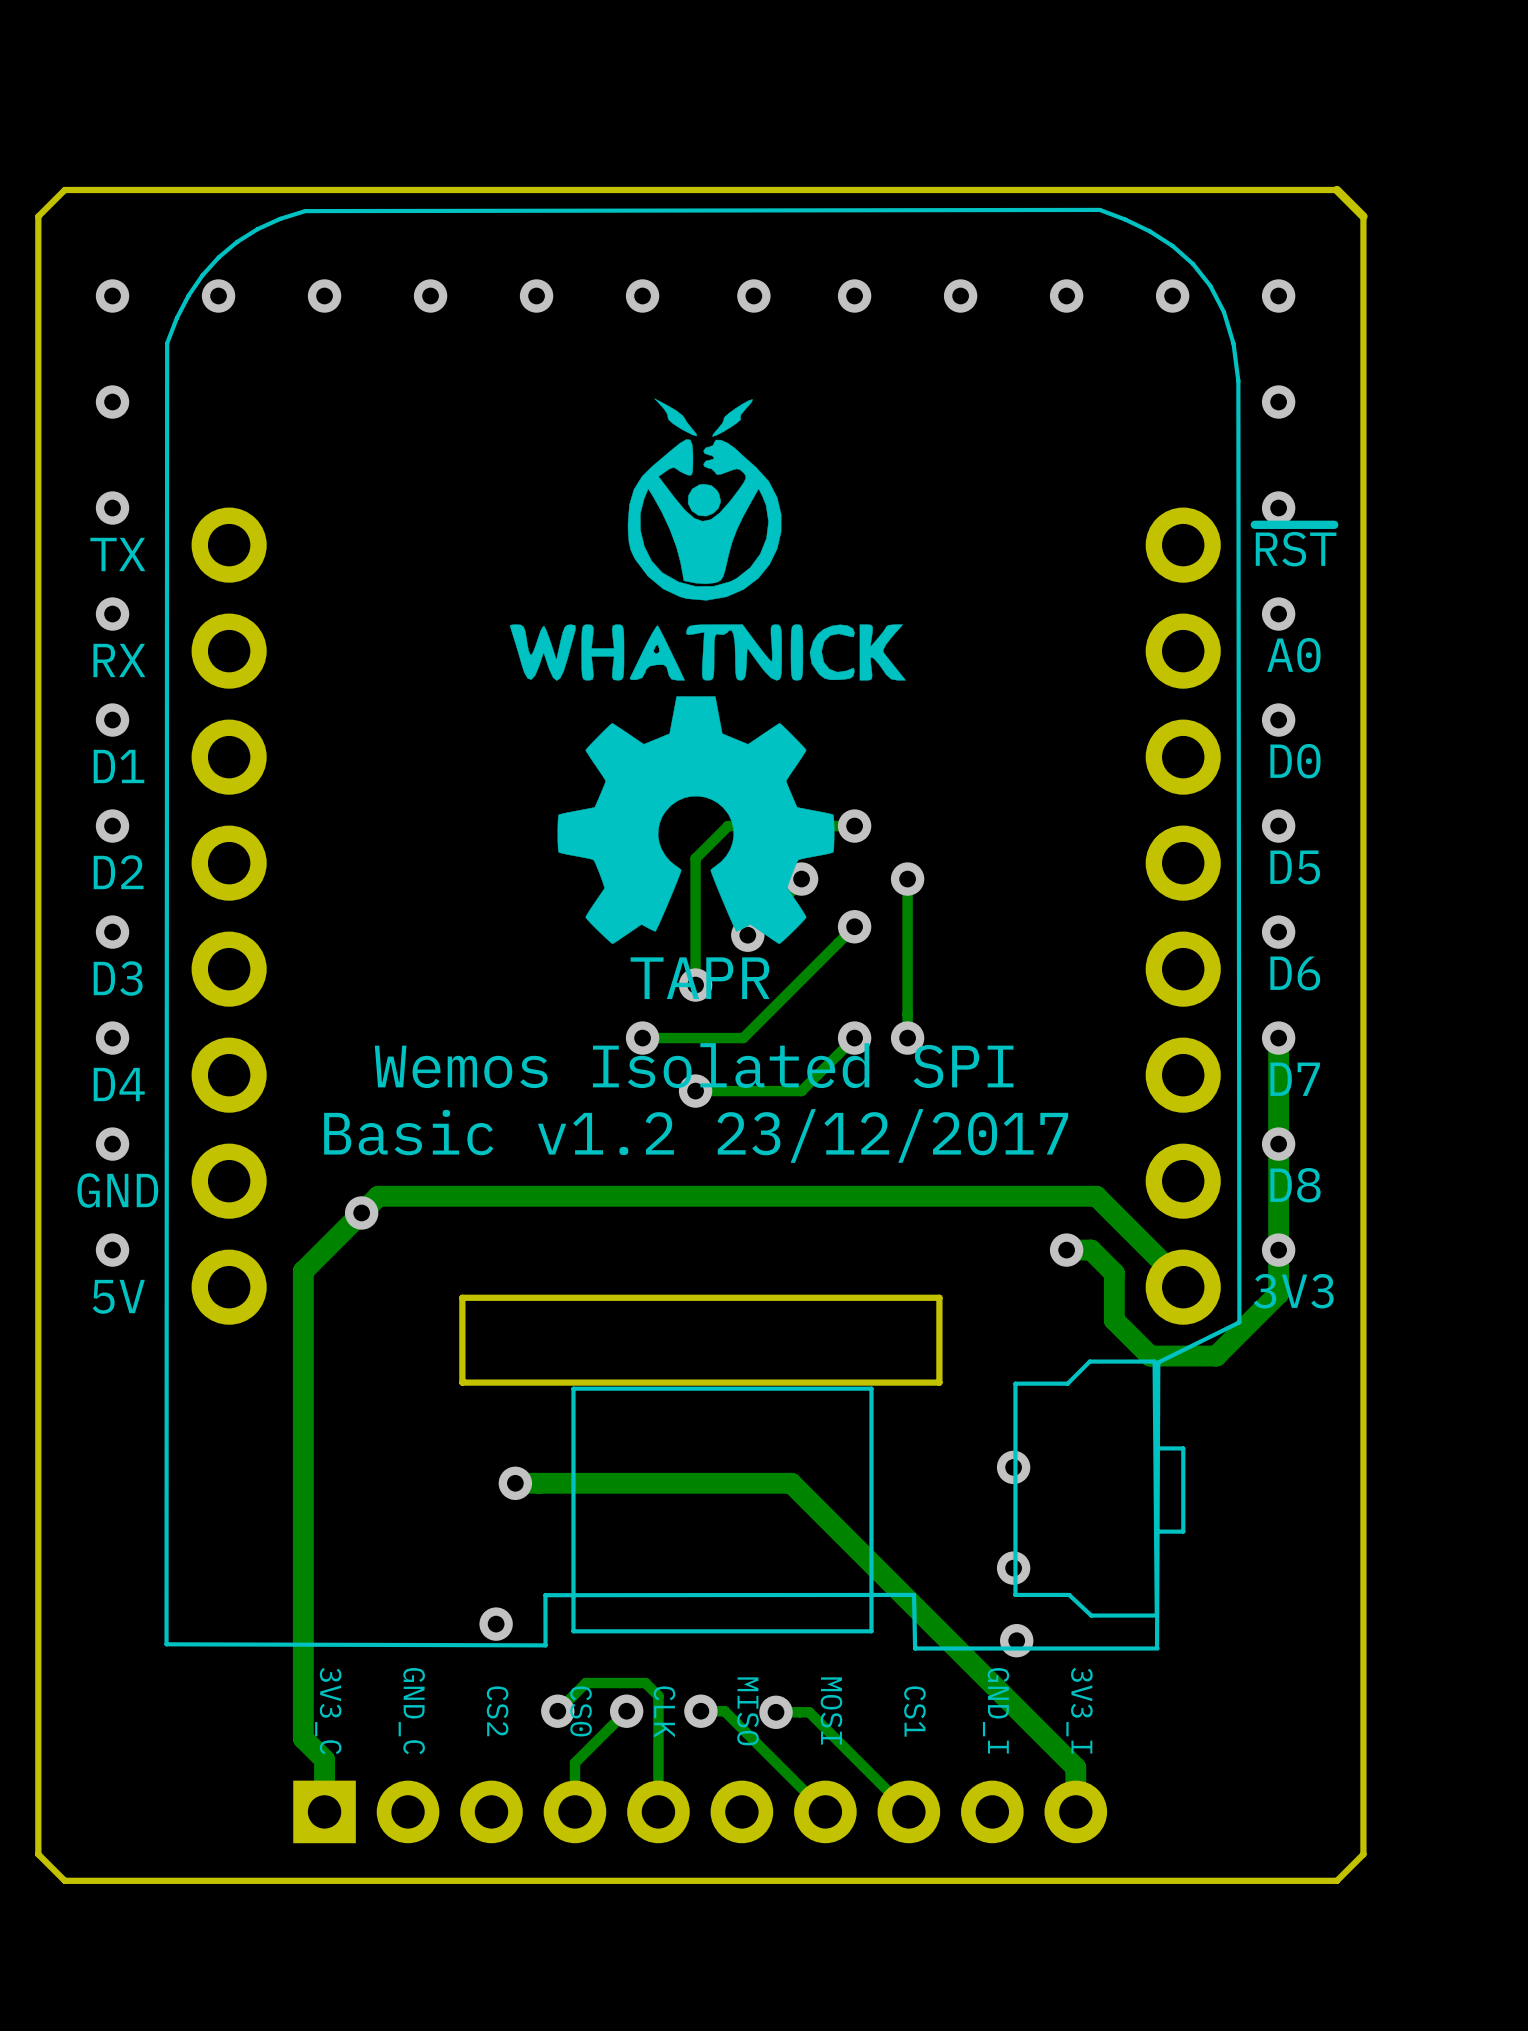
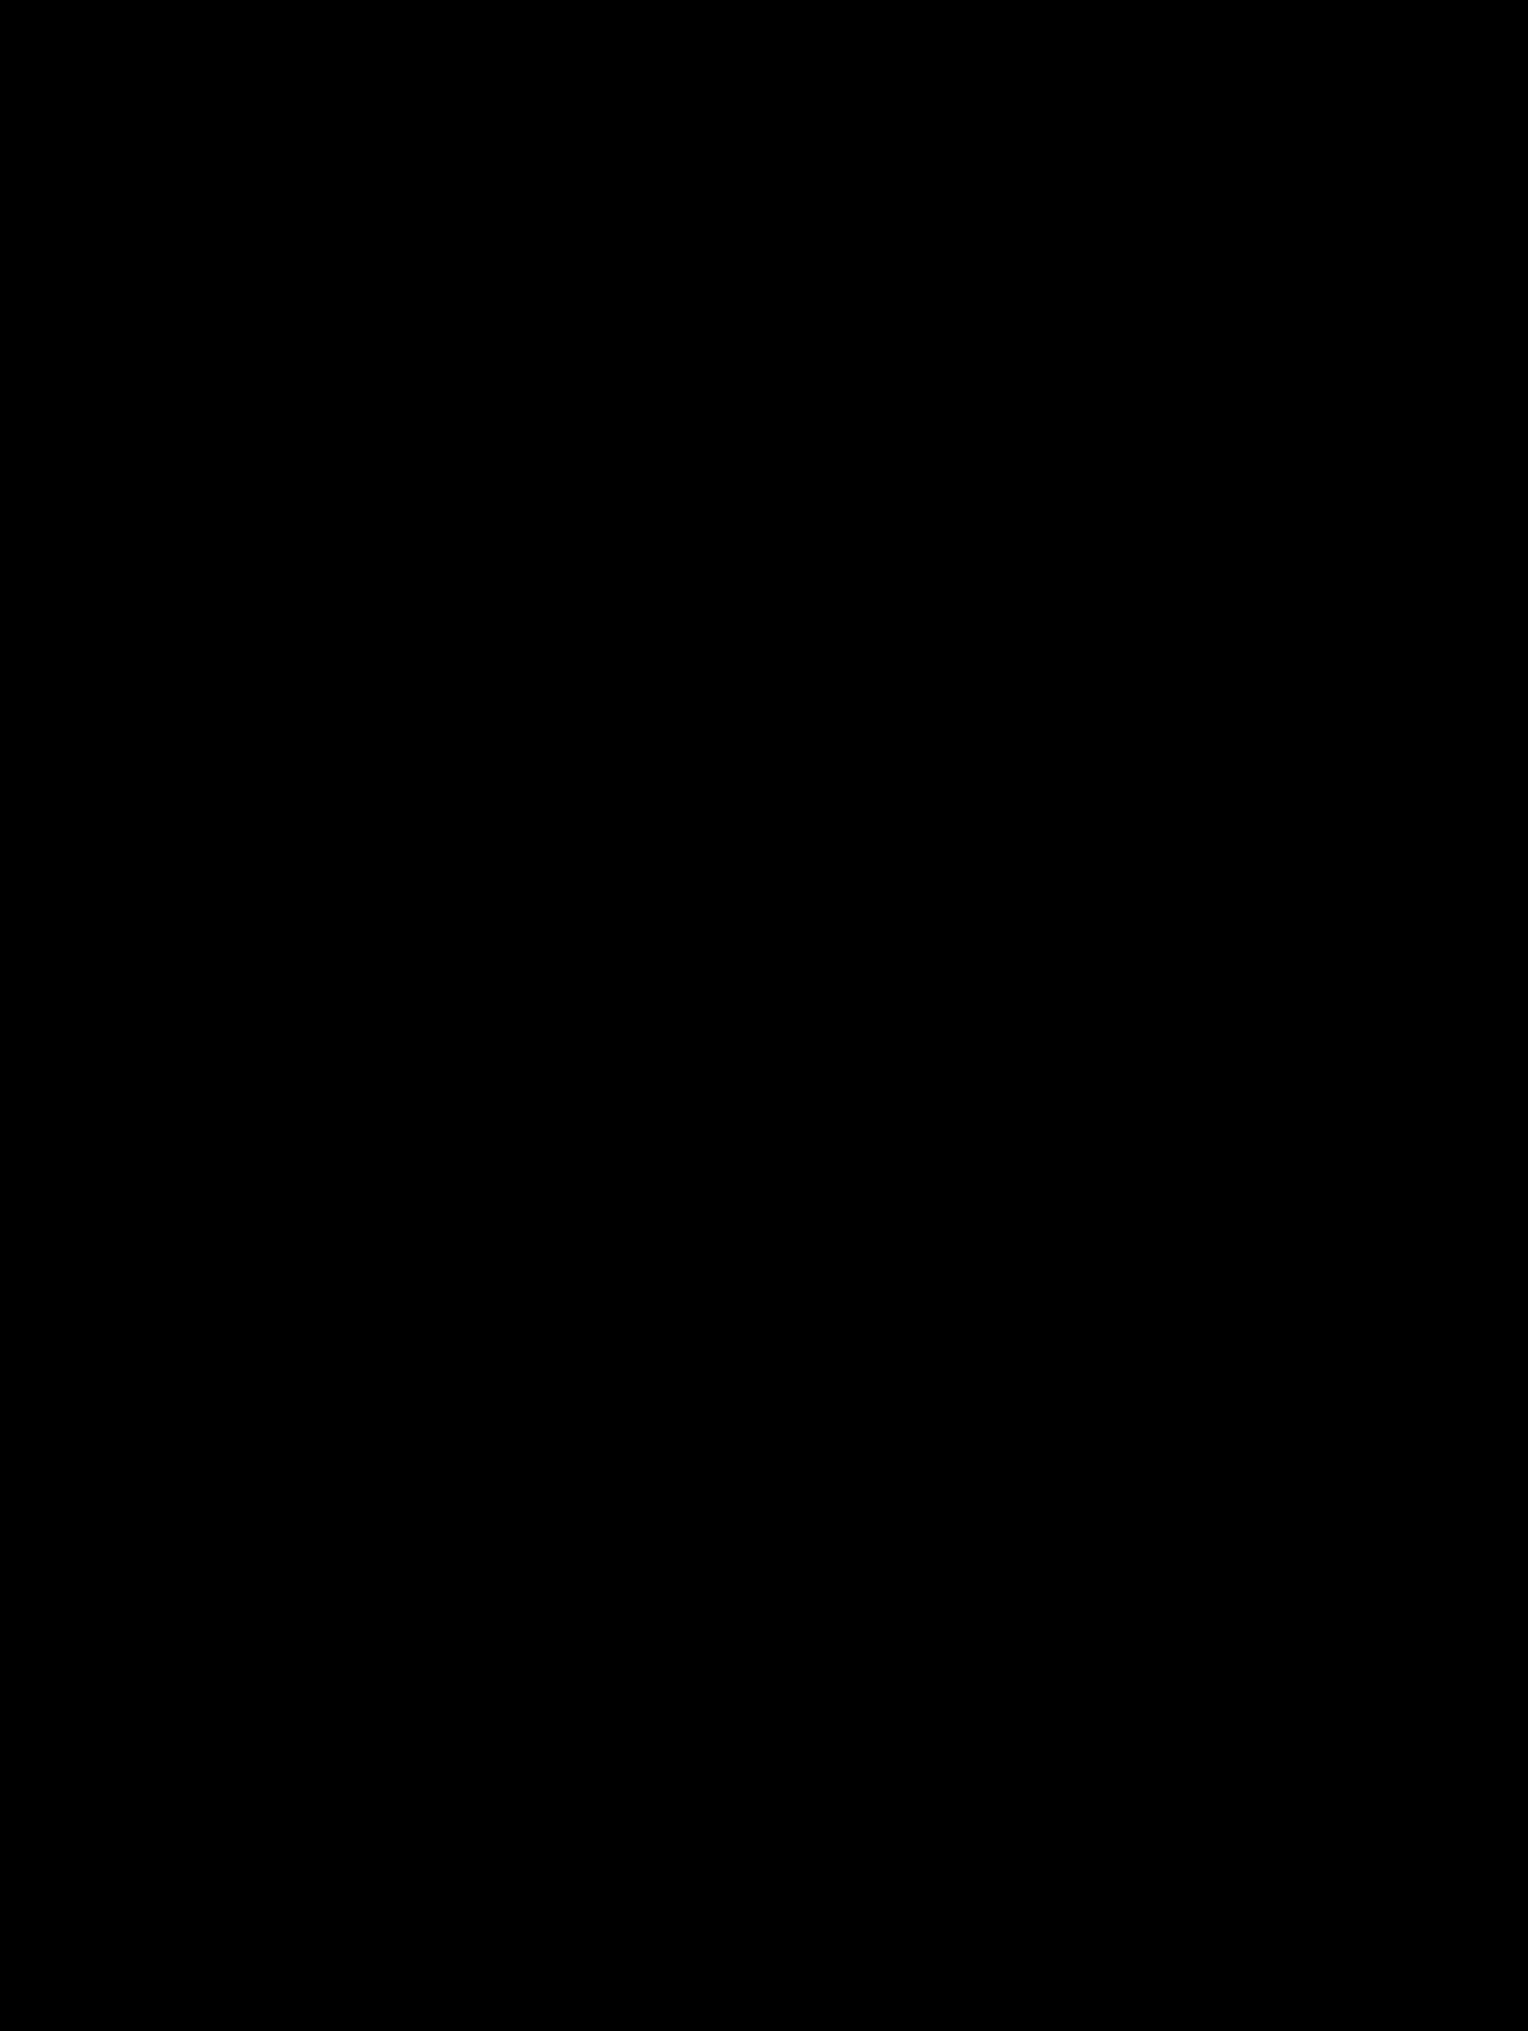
board edge: (1336, 189) (64, 189) (38, 216) (38, 1854) (64, 1880) (1336, 1880) (1363, 1854) (1363, 216) (1336, 189) -> none
via: (112, 296) -> none
via: (218, 296) -> none
via: (324, 296) -> none
via: (430, 296) -> none
via: (536, 296) -> none
via: (642, 296) -> none
via: (753, 296) -> none
via: (854, 296) -> none
via: (960, 296) -> none
via: (1066, 296) -> none
via: (1172, 296) -> none
via: (1278, 296) -> none
drawing: [509, 398, 906, 944] -> none
via: (112, 402) -> none
via: (1278, 402) -> none
via: (112, 508) -> none
via: (1278, 508) -> none
text: ~{RST} (1295, 545) -> none
text: TX (117, 554) -> none
via: (112, 614) -> none
via: (1278, 614) -> none
text: A0 (1293, 655) -> none
text: RX (119, 660) -> none
via: (112, 720) -> none
via: (1278, 720) -> none
text: D0 (1295, 761) -> none
text: D1 (118, 766) -> none
via: (112, 826) -> none
track: (854, 826) (728, 826) (695, 858) (695, 985) -> none
via: (854, 826) -> none
via: (1278, 826) -> none
text: D5 (1295, 867) -> none
text: D2 (118, 872) -> none
via: (801, 879) -> none
track: (907, 879) (907, 1038) -> none
via: (907, 879) -> none
track: (854, 926) (743, 1038) (642, 1038) -> none
via: (854, 926) -> none
part: (702, 929) -> none
via: (112, 932) -> none
via: (1278, 932) -> none
via: (747, 935) -> none
text: D6 (1295, 973) -> none
text: D3 (118, 978) -> none
text: TAPR (700, 978) -> none
via: (695, 985) -> none
via: (112, 1038) -> none
via: (642, 1038) -> none
track: (854, 1038) (801, 1091) (695, 1091) -> none
via: (854, 1038) -> none
via: (907, 1038) -> none
track: (1278, 1038) (1278, 1293) (1216, 1356) (1150, 1356) (1114, 1320) (1114, 1273) (1091, 1250) (1066, 1250) -> none
via: (1278, 1038) -> none
text: Wemos Isolated SPI (694, 1065) -> none
text: D7 (1295, 1079) -> none
text: D4 (119, 1084) -> none
via: (695, 1091) -> none
text: Basic v1.2 23/12/2017 (696, 1135) -> none
via: (112, 1144) -> none
via: (1278, 1144) -> none
text: D8 (1295, 1185) -> none
text: GND (117, 1190) -> none
via: (361, 1212) -> none
via: (112, 1250) -> none
via: (1066, 1250) -> none
via: (1278, 1250) -> none
track: (1183, 1287) (1183, 1283) (1096, 1196) (378, 1196) (303, 1271) (303, 1738) (324, 1759) (324, 1811) -> none
text: 3V3 (1293, 1291) -> none
text: 5V (118, 1296) -> none
board edge: (939, 1297) (939, 1382) (462, 1382) (462, 1297) (939, 1297) -> none
via: (1013, 1467) -> none
track: (515, 1483) (791, 1483) (1075, 1767) (1075, 1811) -> none
via: (515, 1483) -> none
via: (1013, 1568) -> none
via: (496, 1624) -> none
via: (1016, 1640) -> none
text: MOSI (831, 1710) -> none
text: GND_I (996, 1710) -> none
text: 3V3_I (1079, 1710) -> none
text: 3V3_C (328, 1711) -> none
text: GND_C (411, 1711) -> none
text: CS2 (497, 1711) -> none
track: (557, 1711) (585, 1683) (645, 1683) (658, 1695) (658, 1811) -> none
via: (557, 1711) -> none
text: CS0 (581, 1711) -> none
track: (626, 1711) (574, 1762) (574, 1811) -> none
via: (626, 1711) -> none
text: CLK (664, 1711) -> none
track: (700, 1711) (724, 1711) (825, 1811) -> none
via: (700, 1711) -> none
text: MISO (747, 1711) -> none
text: CS1 (914, 1711) -> none
track: (776, 1712) (809, 1712) (908, 1811) -> none
via: (776, 1712) -> none
part: (700, 1811) -> none

